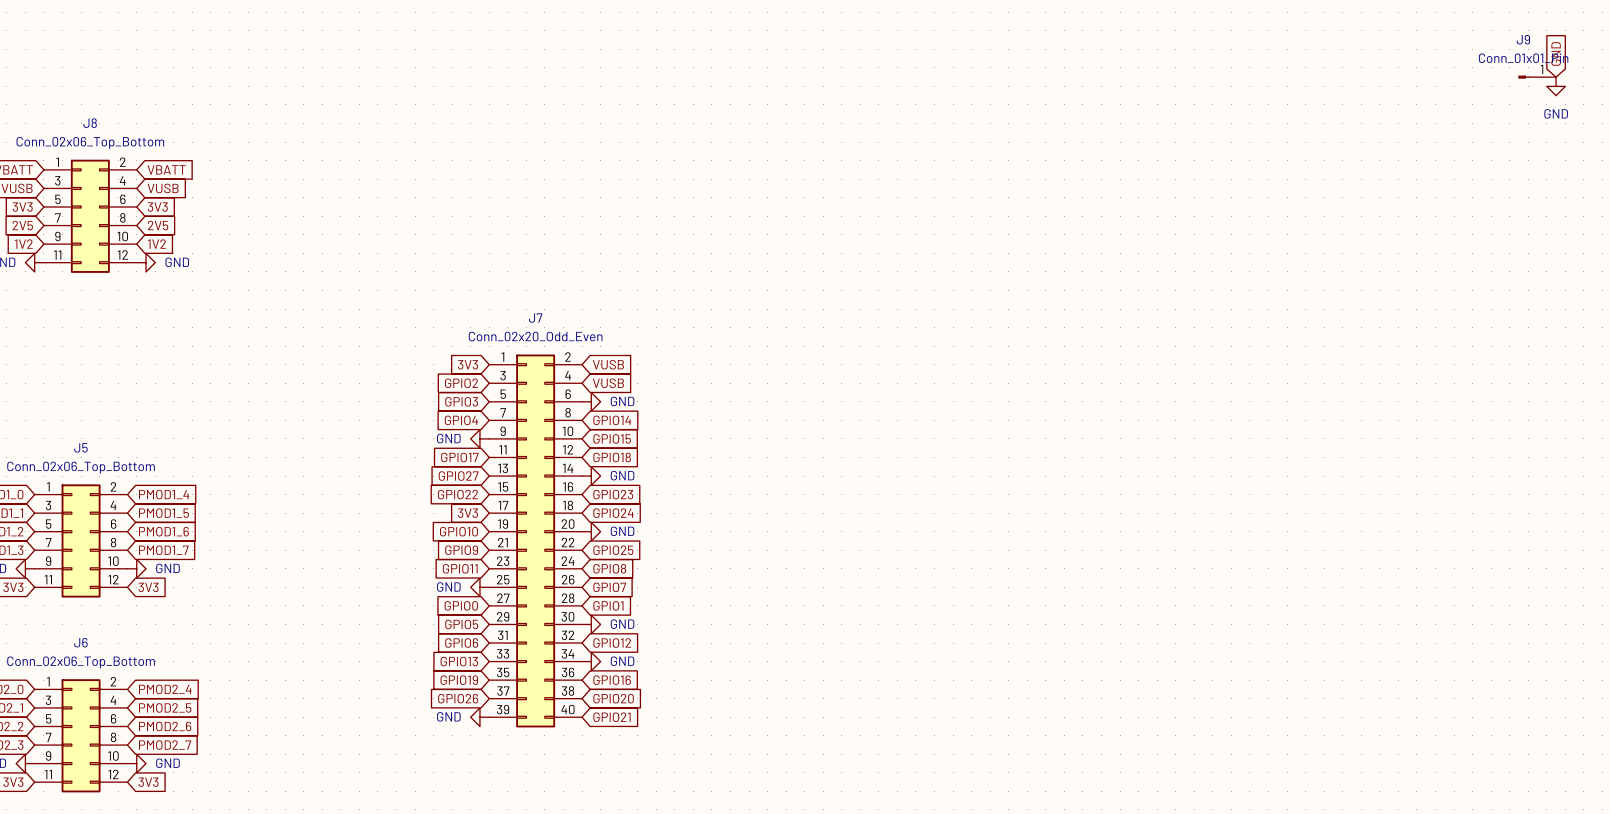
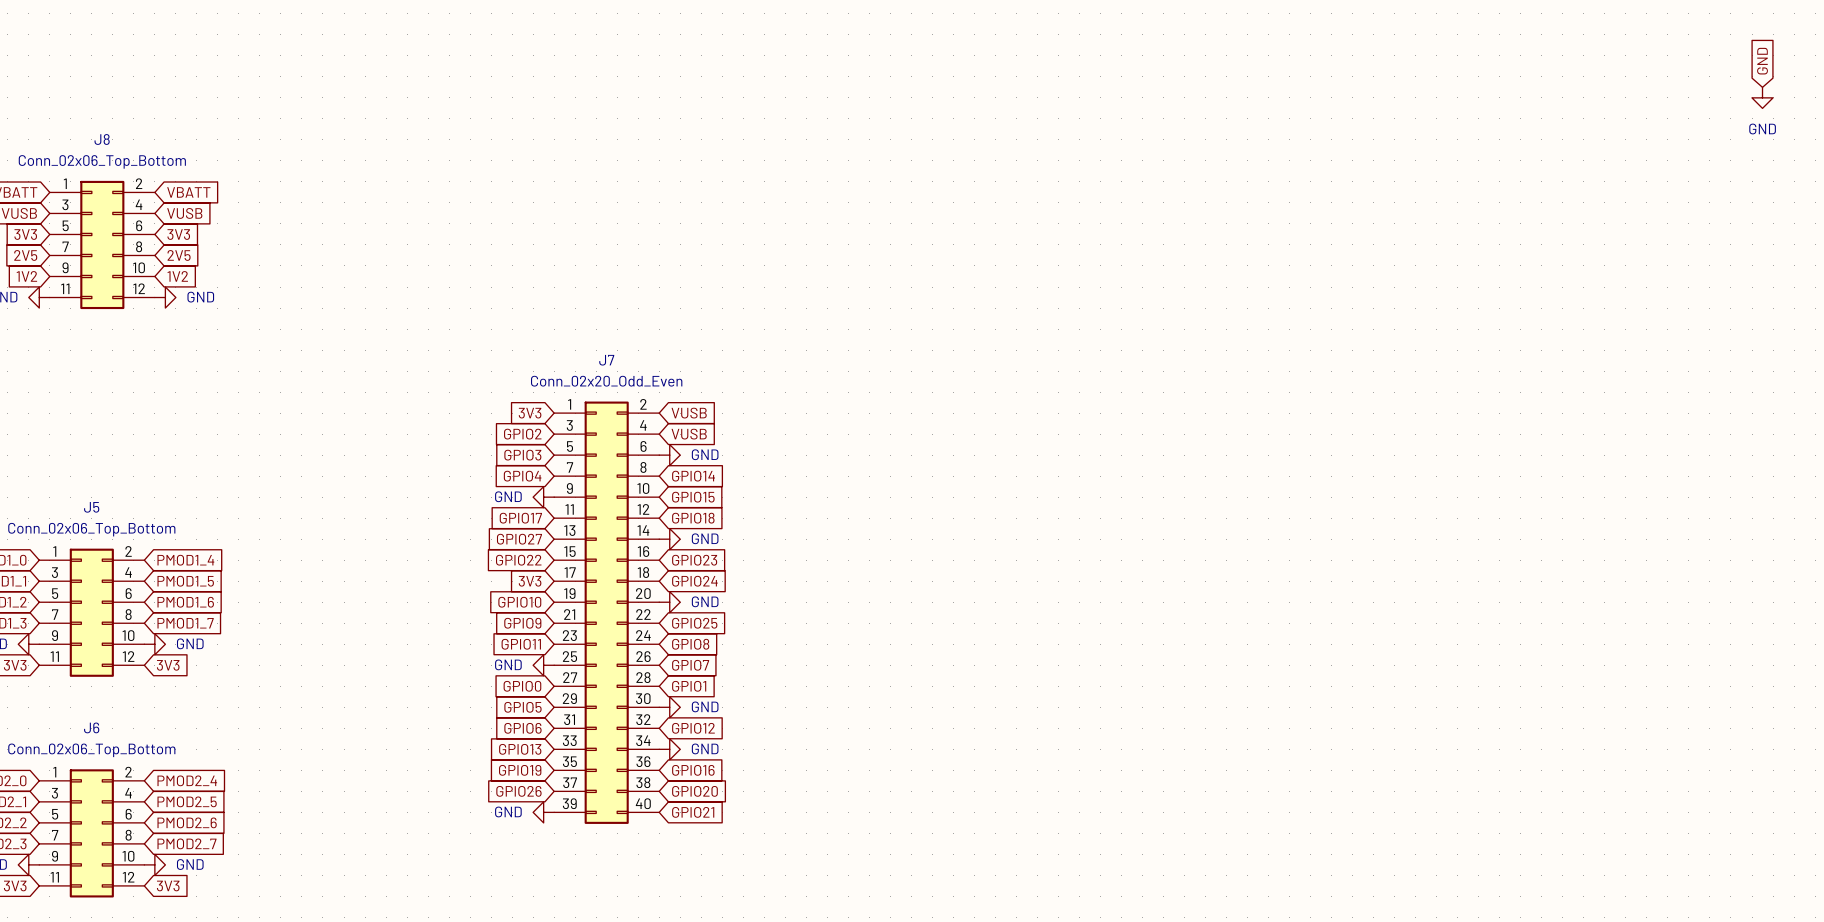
J9: Conn_01x01_Pin (1537, 77) -> none

